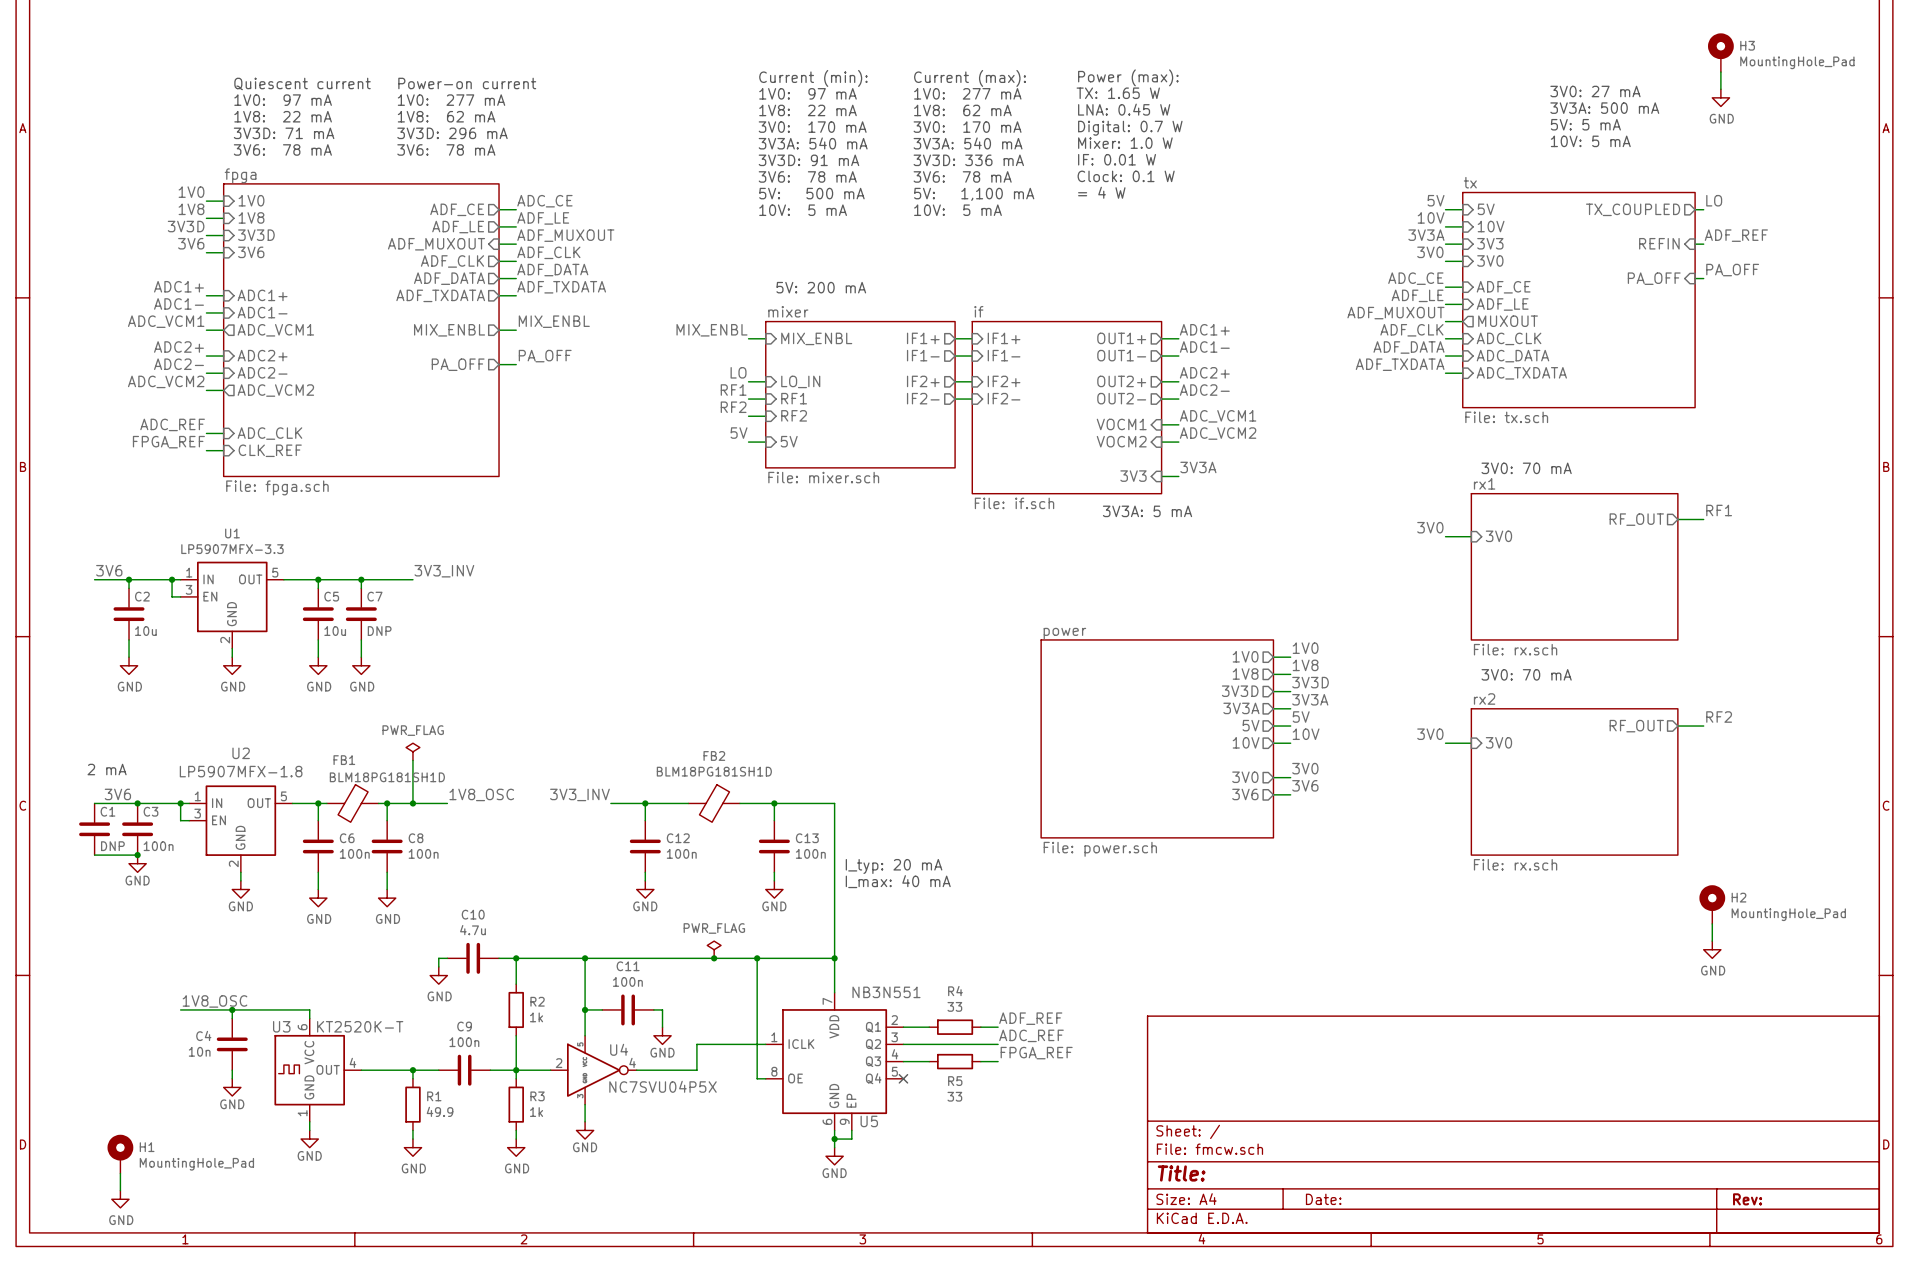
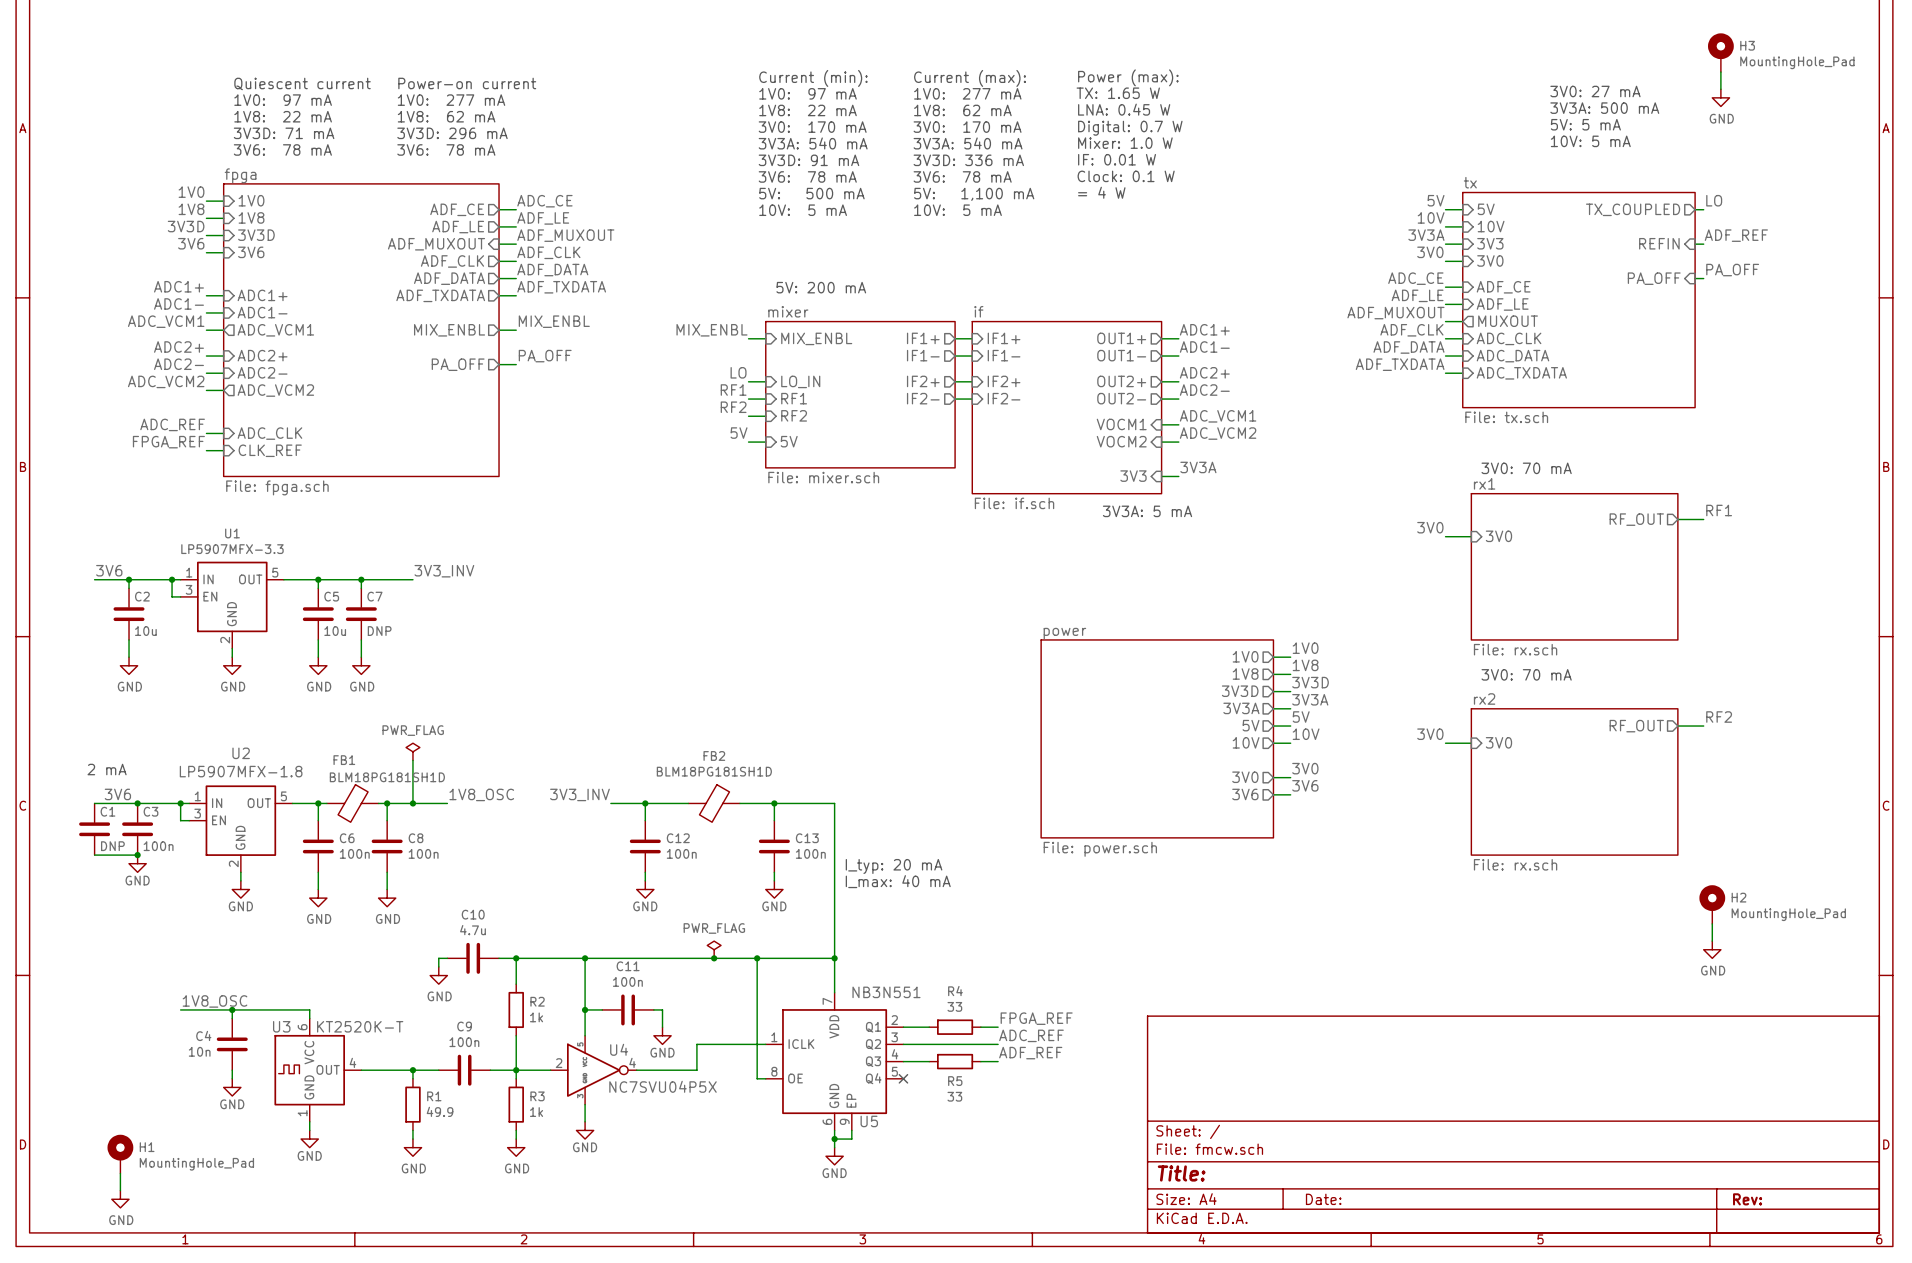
label: ADF_REF (1030, 1018) -> FPGA_REF (1036, 1018)
label: FPGA_REF (1036, 1053) -> ADF_REF (1030, 1053)

